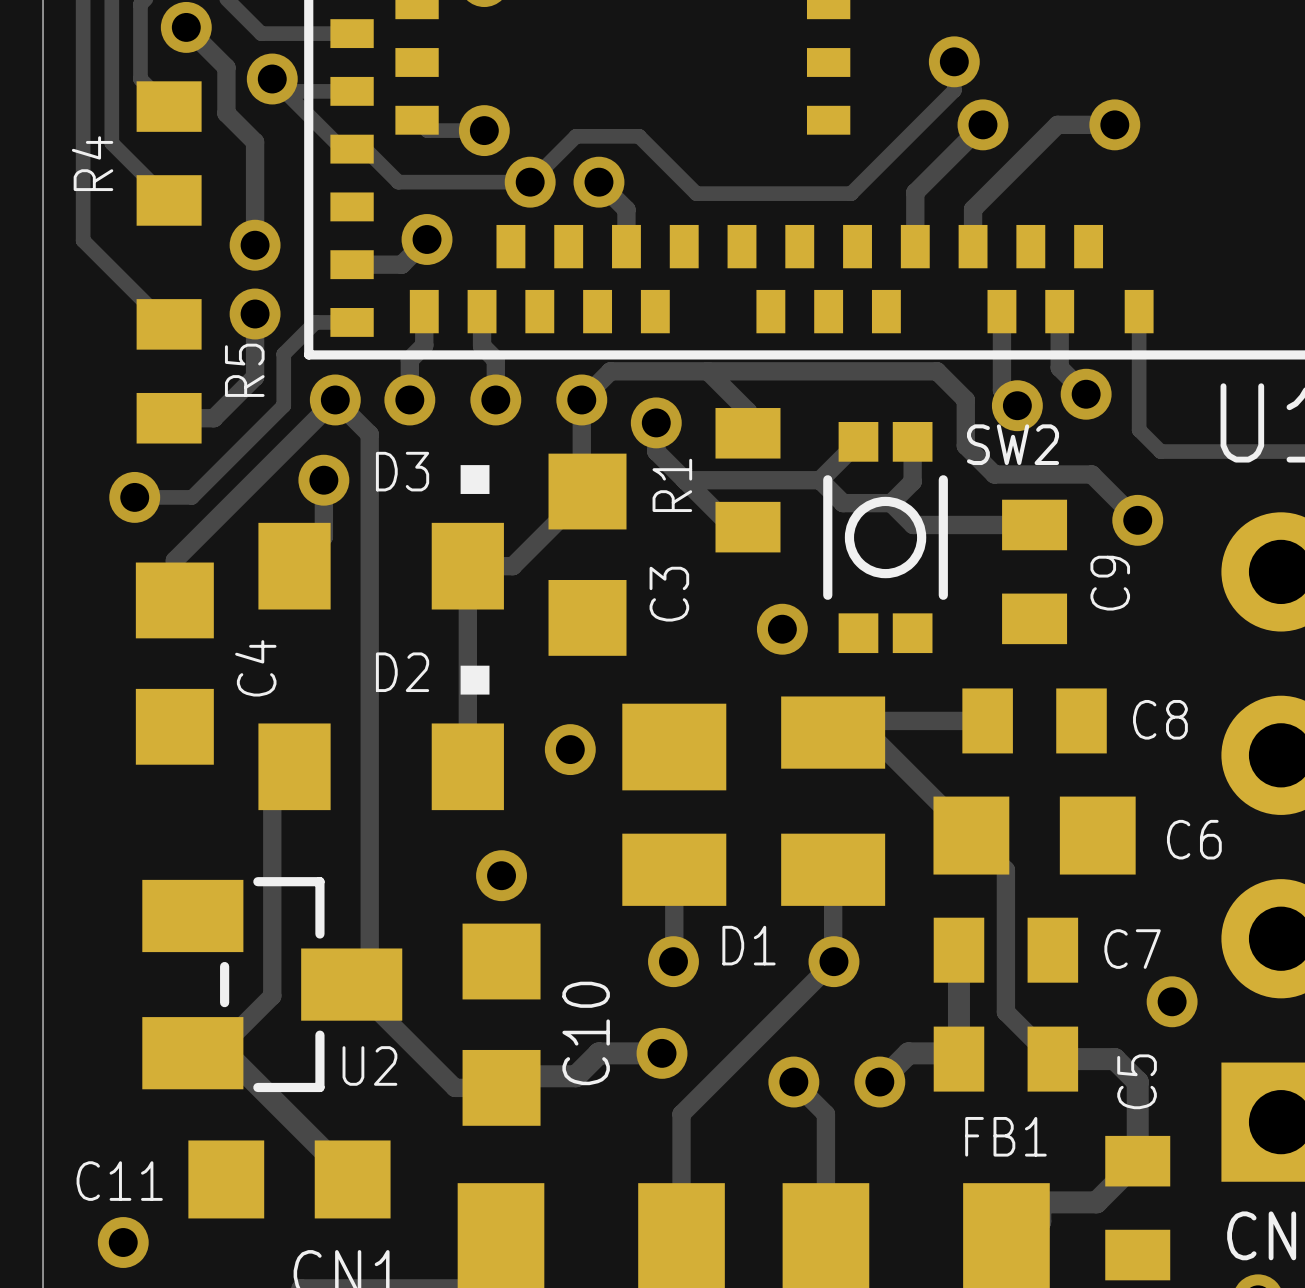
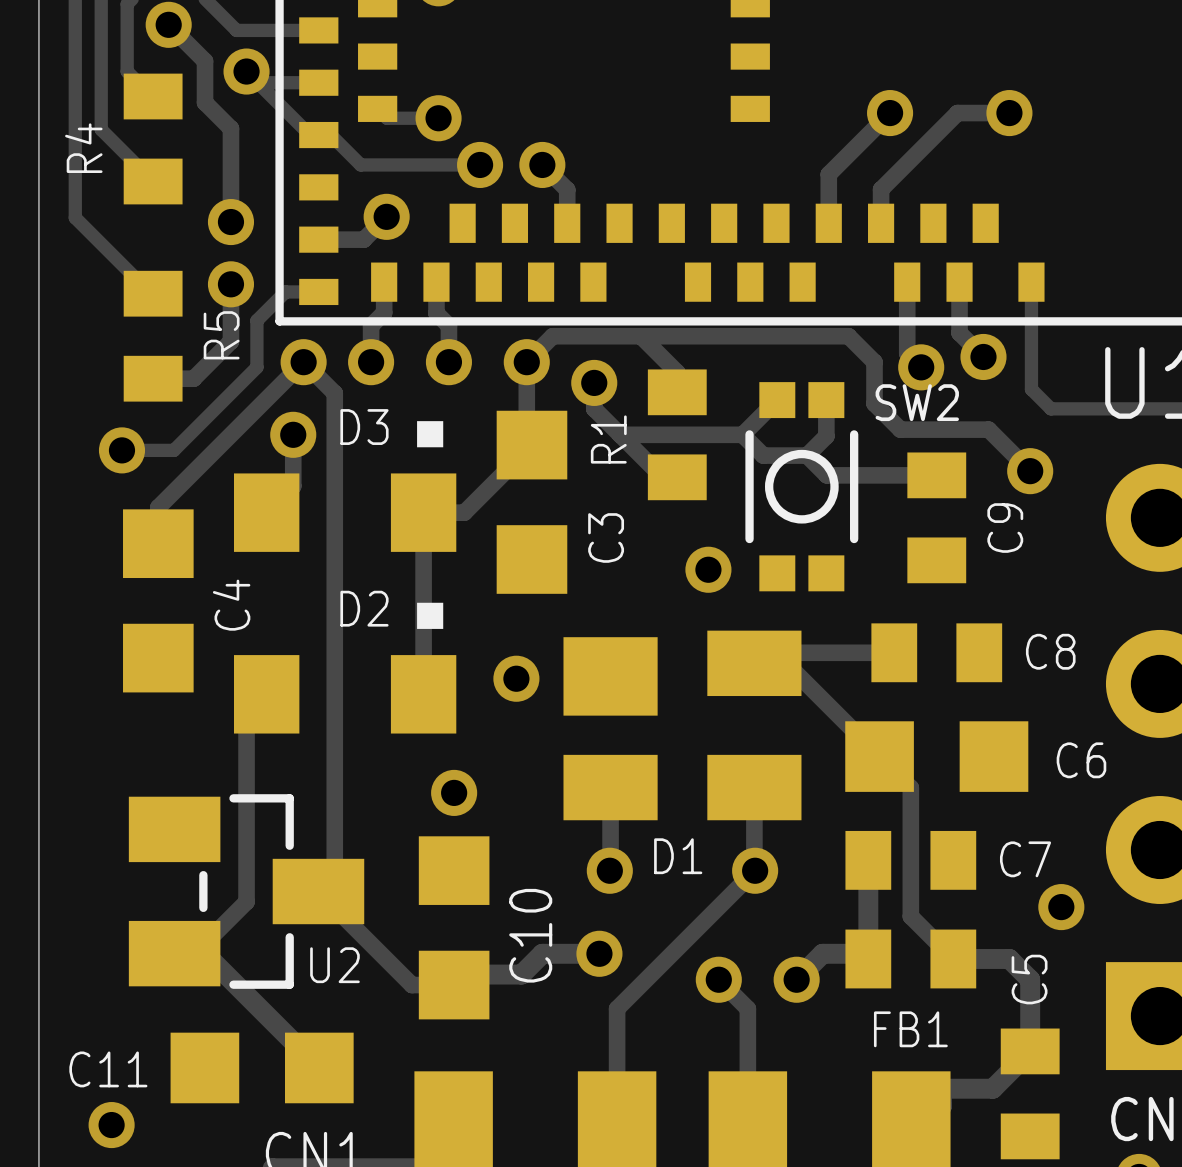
track: (954, 61) (954, 90) (851, 193) (696, 193) (639, 136) (576, 136) (530, 182) -> none
via: (954, 61) -> none

